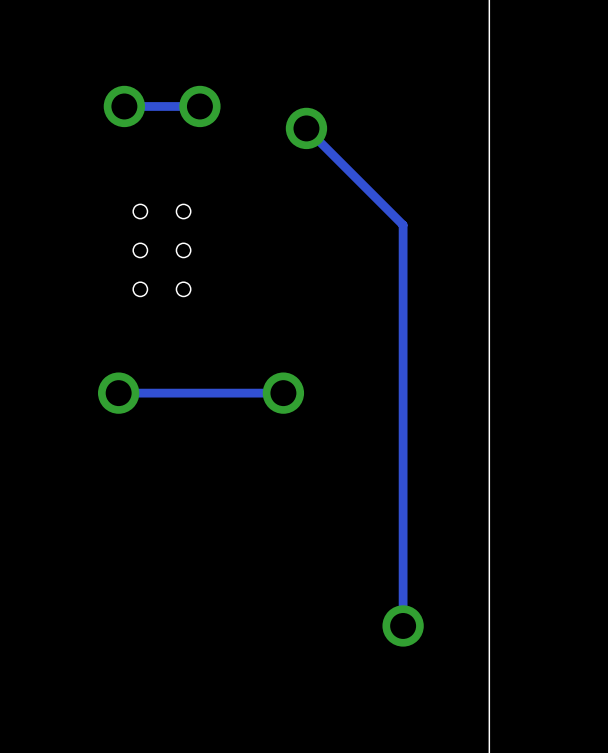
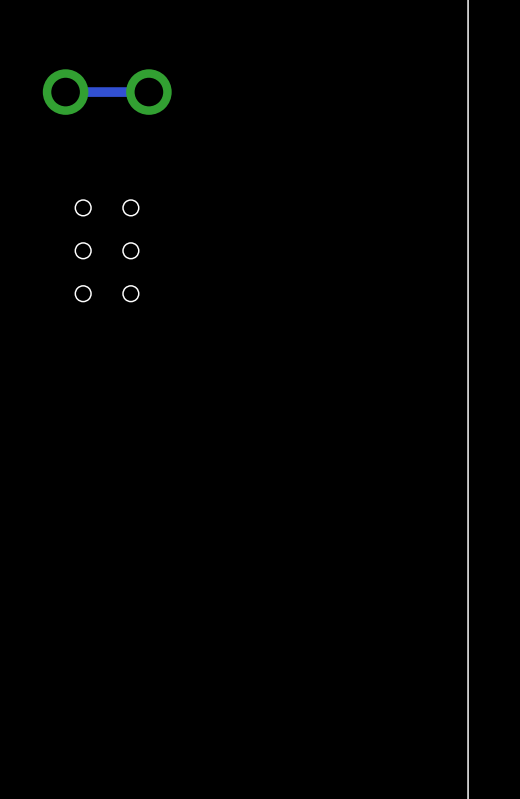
track: (306, 128) (403, 225) (403, 625) -> none
via: (306, 128) -> none
via: (118, 393) -> none
track: (283, 393) (118, 393) -> none
via: (283, 393) -> none
via: (403, 625) -> none

